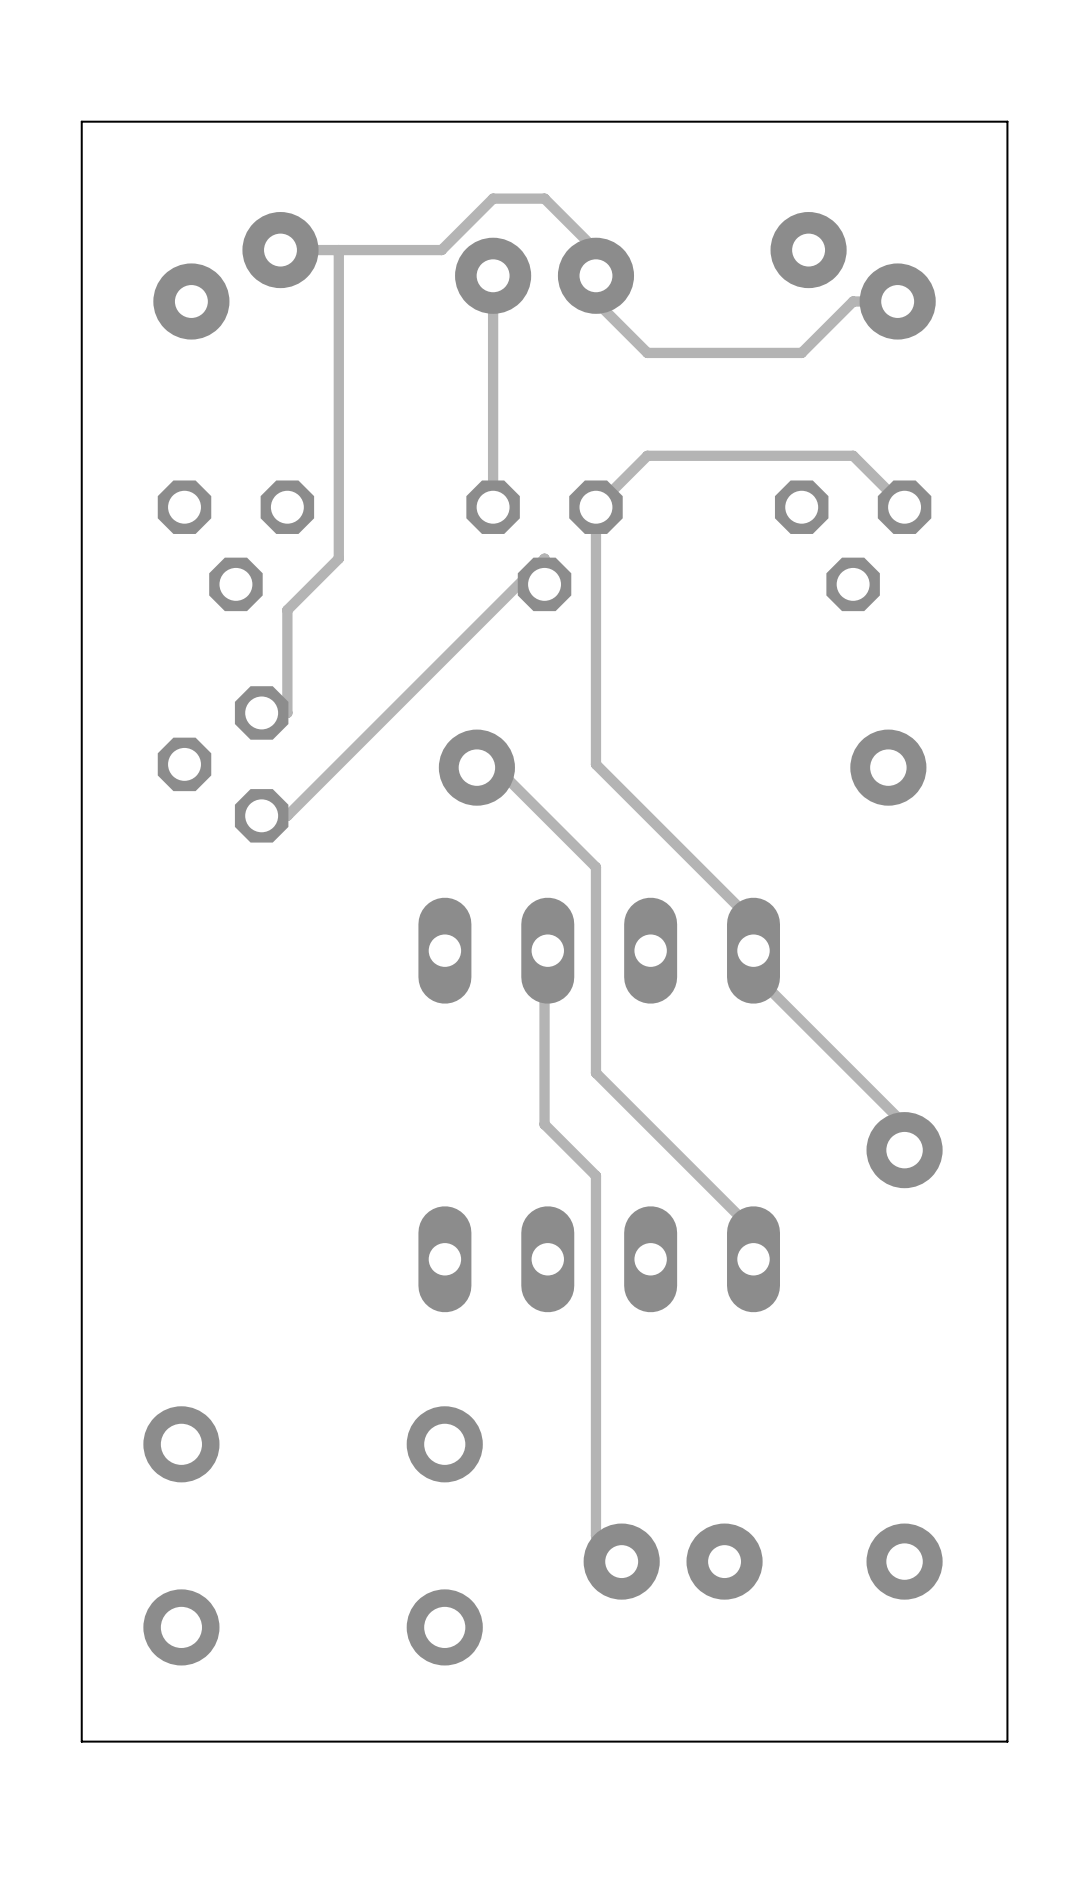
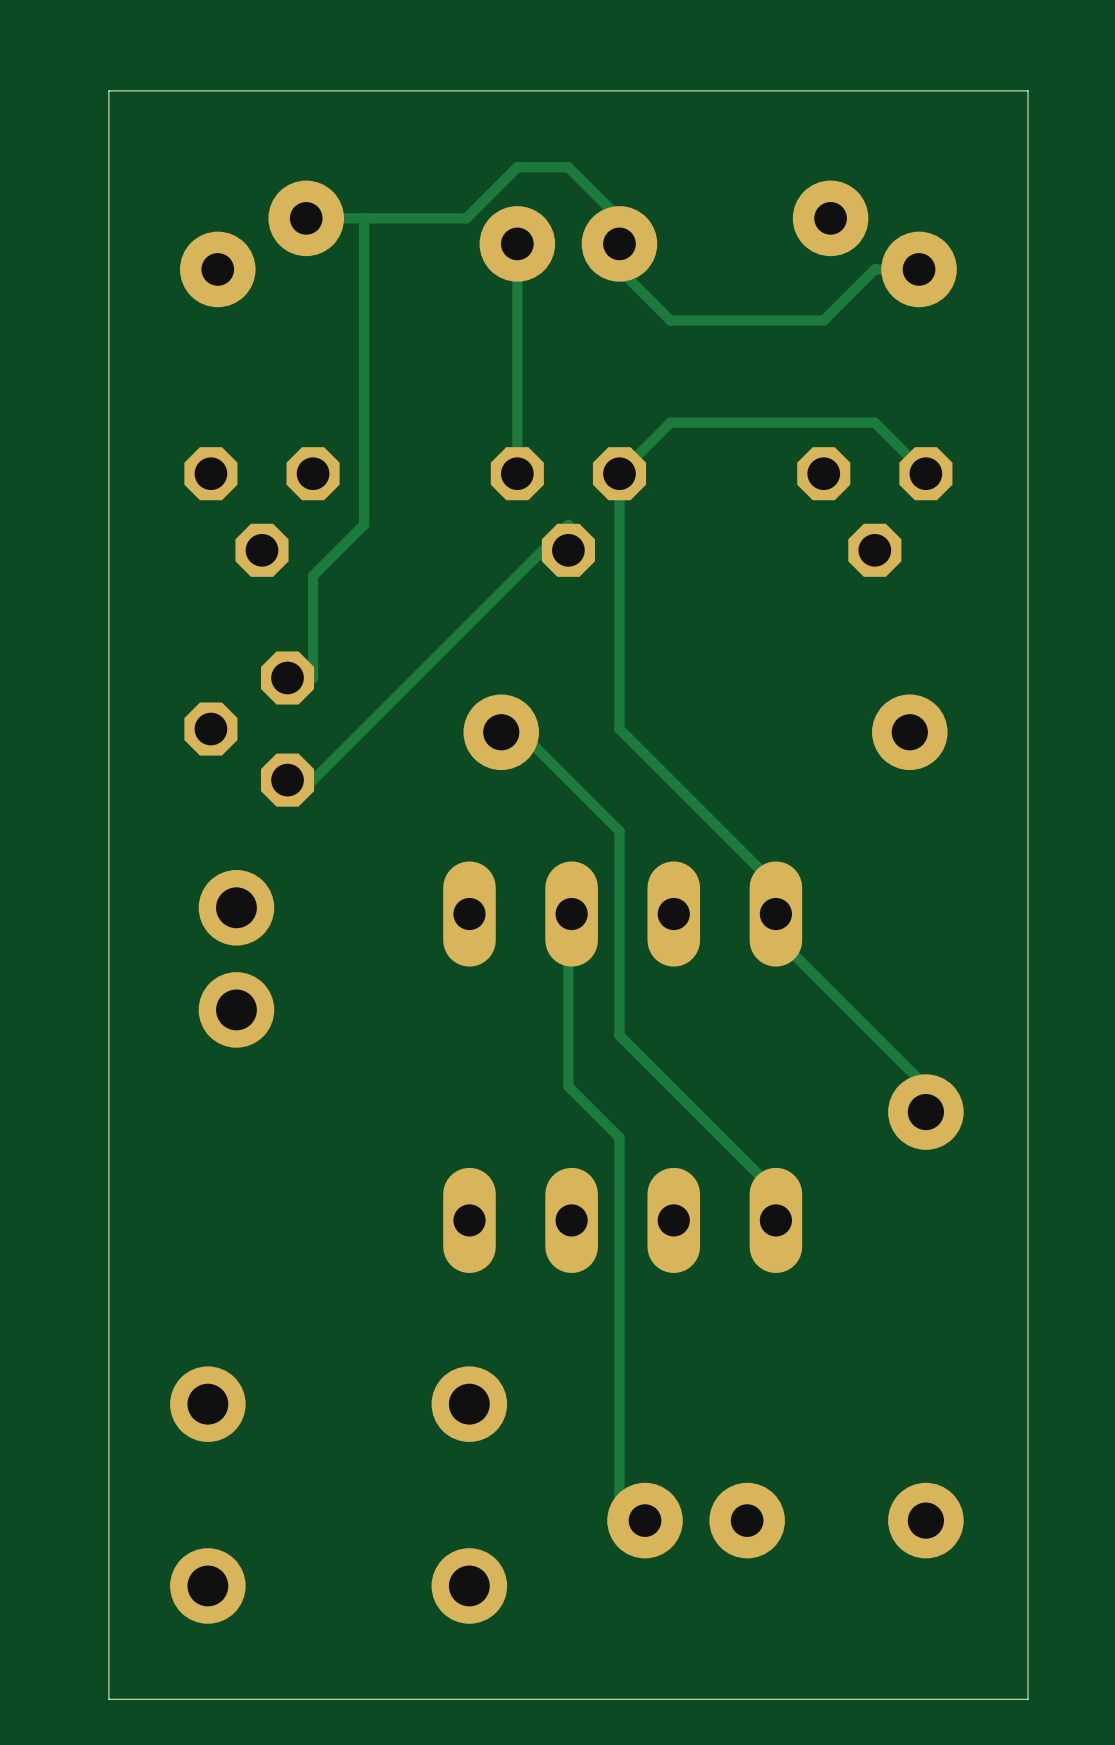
part: none -> (236, 958)

